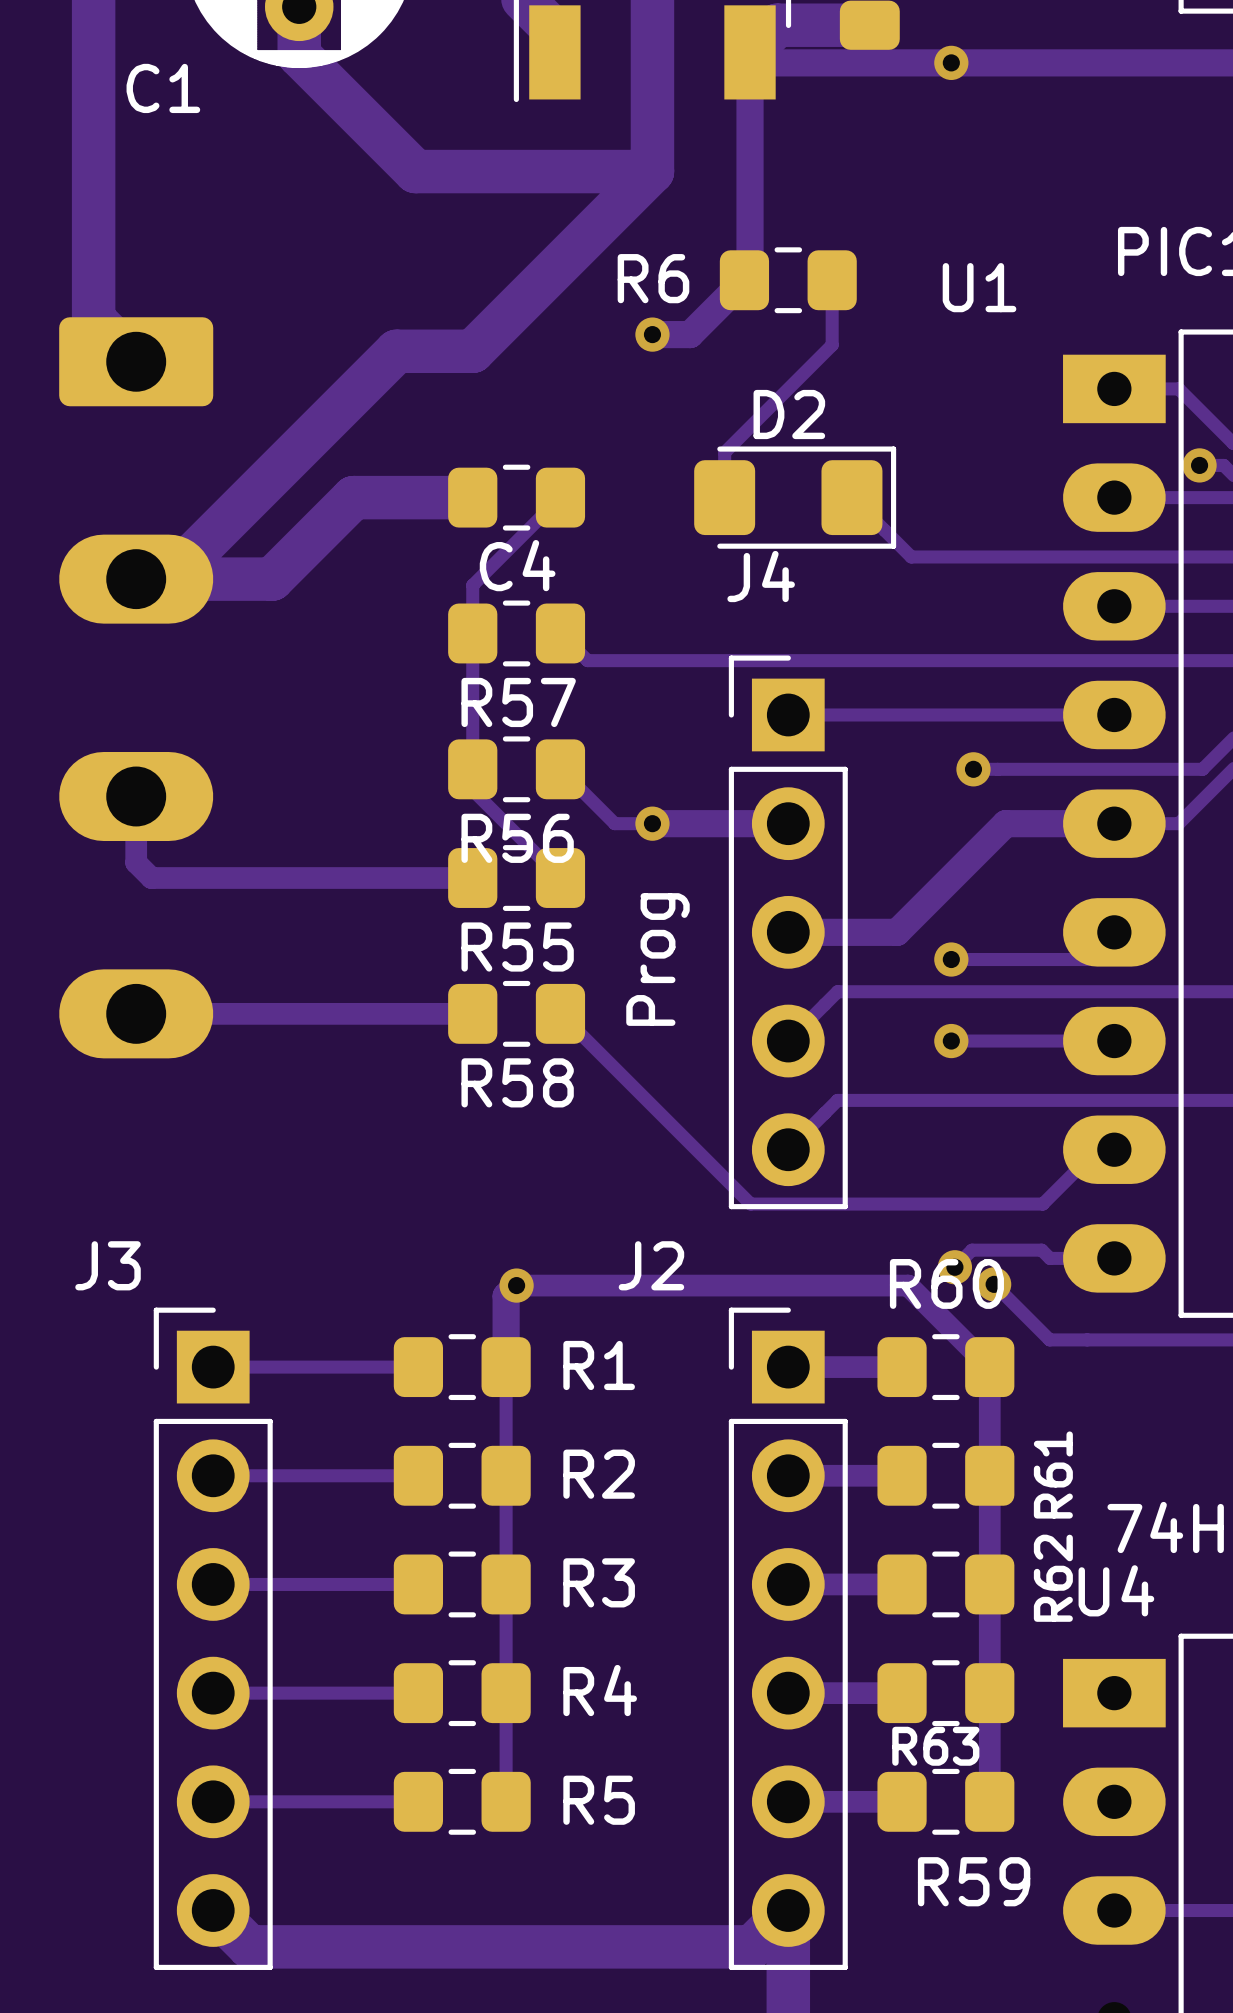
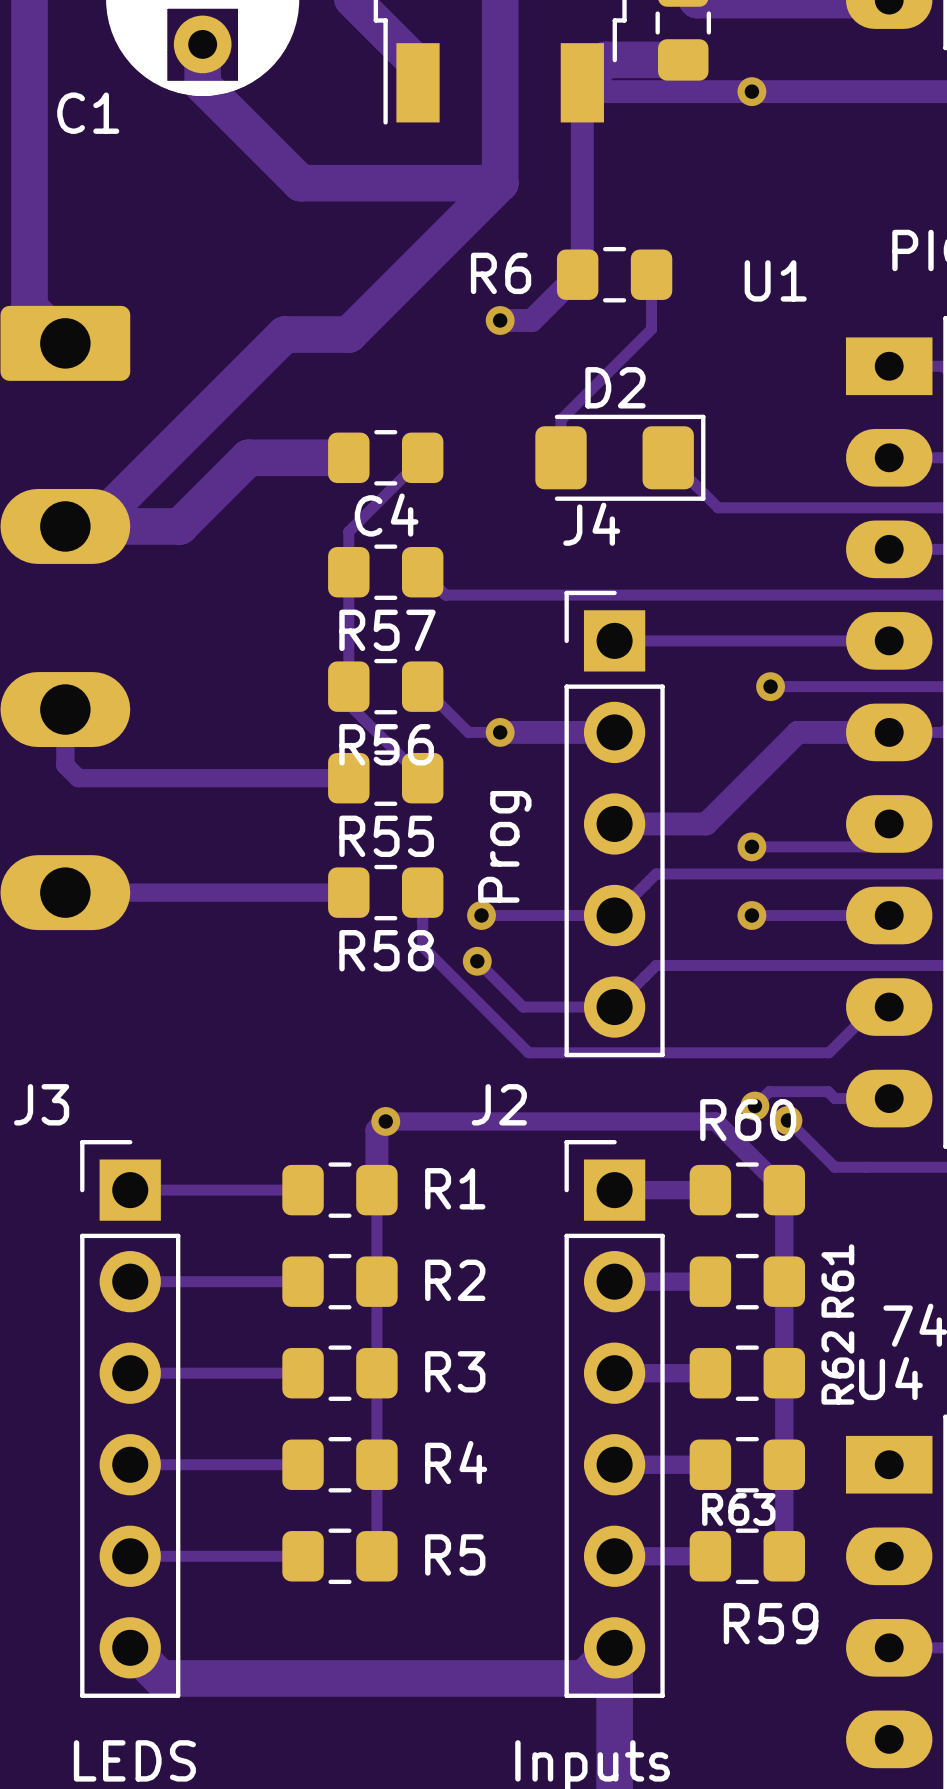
track: (560, 1013) (750, 1204) -> (422, 892) (422, 946) (528, 1052) (582, 1052)
track: none -> (481, 915) (614, 915)
via: none -> (481, 915)
track: none -> (477, 961) (523, 1007) (614, 1007)
via: none -> (477, 961)

